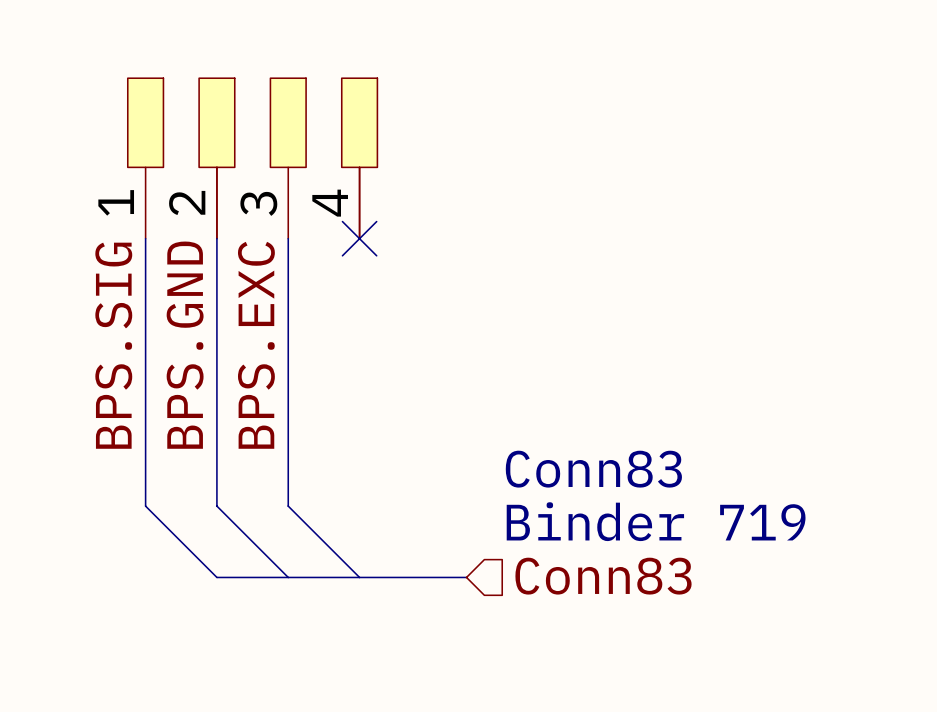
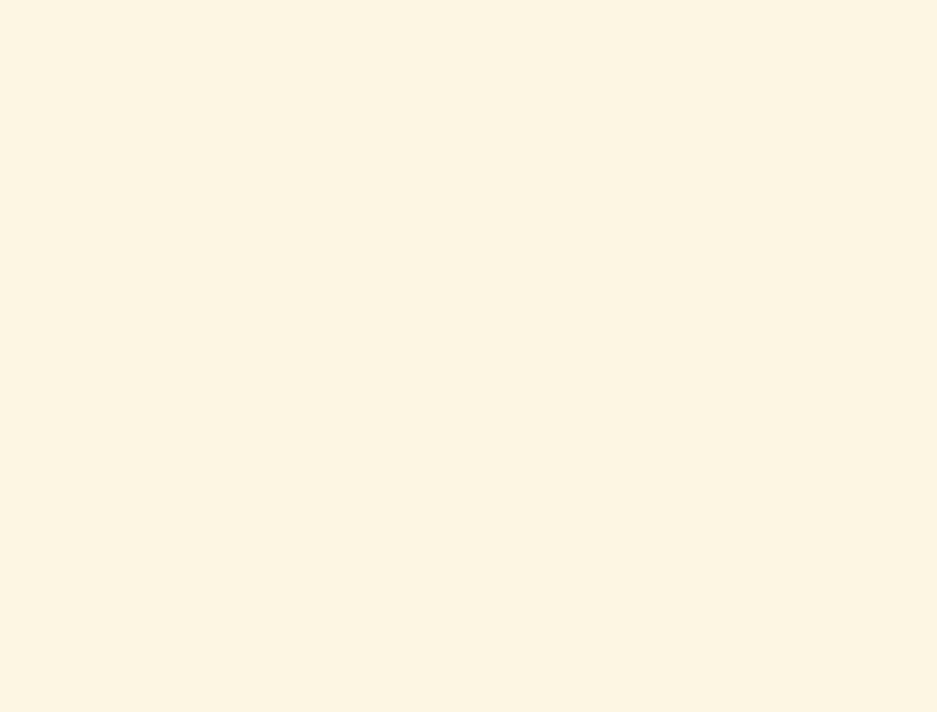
Conn83: (252, 158) -> none
wire: (145, 238) (145, 506) (216, 577) -> none
wire: (216, 238) (216, 506) (288, 577) -> none
wire: (288, 238) (288, 506) (359, 577) -> none
no-connect mark: (359, 238) -> none
label: BPS.SIG (113, 345) -> none
label: BPS.GND (185, 345) -> none
label: BPS.EXC (256, 345) -> none
hierarchical label: Conn83 (603, 576) -> none
bus: (216, 577) (466, 577) -> none

